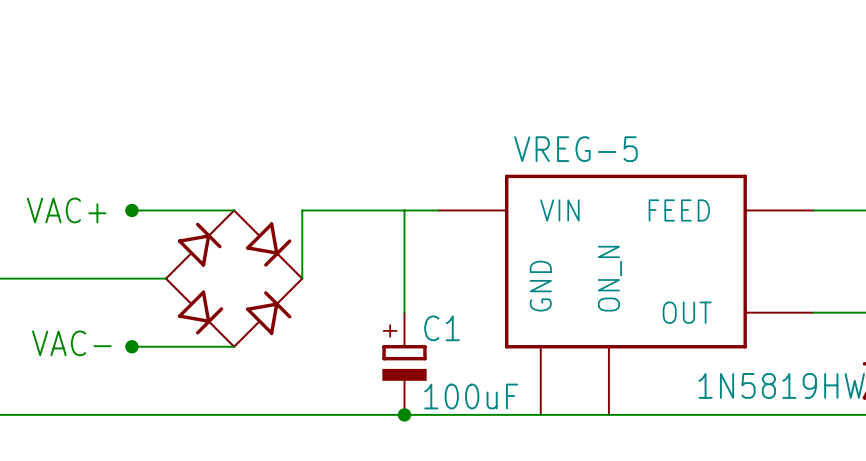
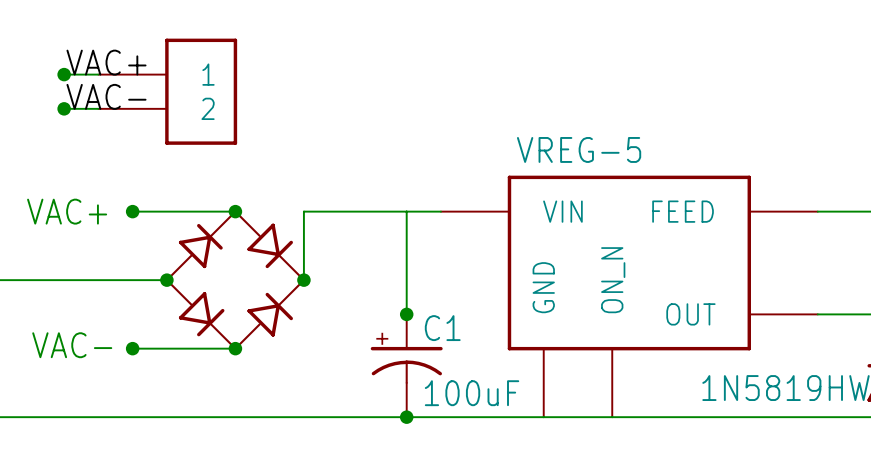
label: none -> VAC+ (106, 62)
wire: none -> (64, 74) (98, 74)
junction: none -> (64, 74)
part: none -> (167, 91)
label: none -> VAC- (106, 96)
wire: none -> (64, 108) (98, 108)
junction: none -> (64, 108)
junction: none -> (235, 211)
junction: none -> (166, 280)
junction: none -> (303, 280)
C1 symbol: [382, 312, 427, 415] -> [370, 314, 443, 418]
junction: none -> (406, 314)
junction: none -> (235, 348)

